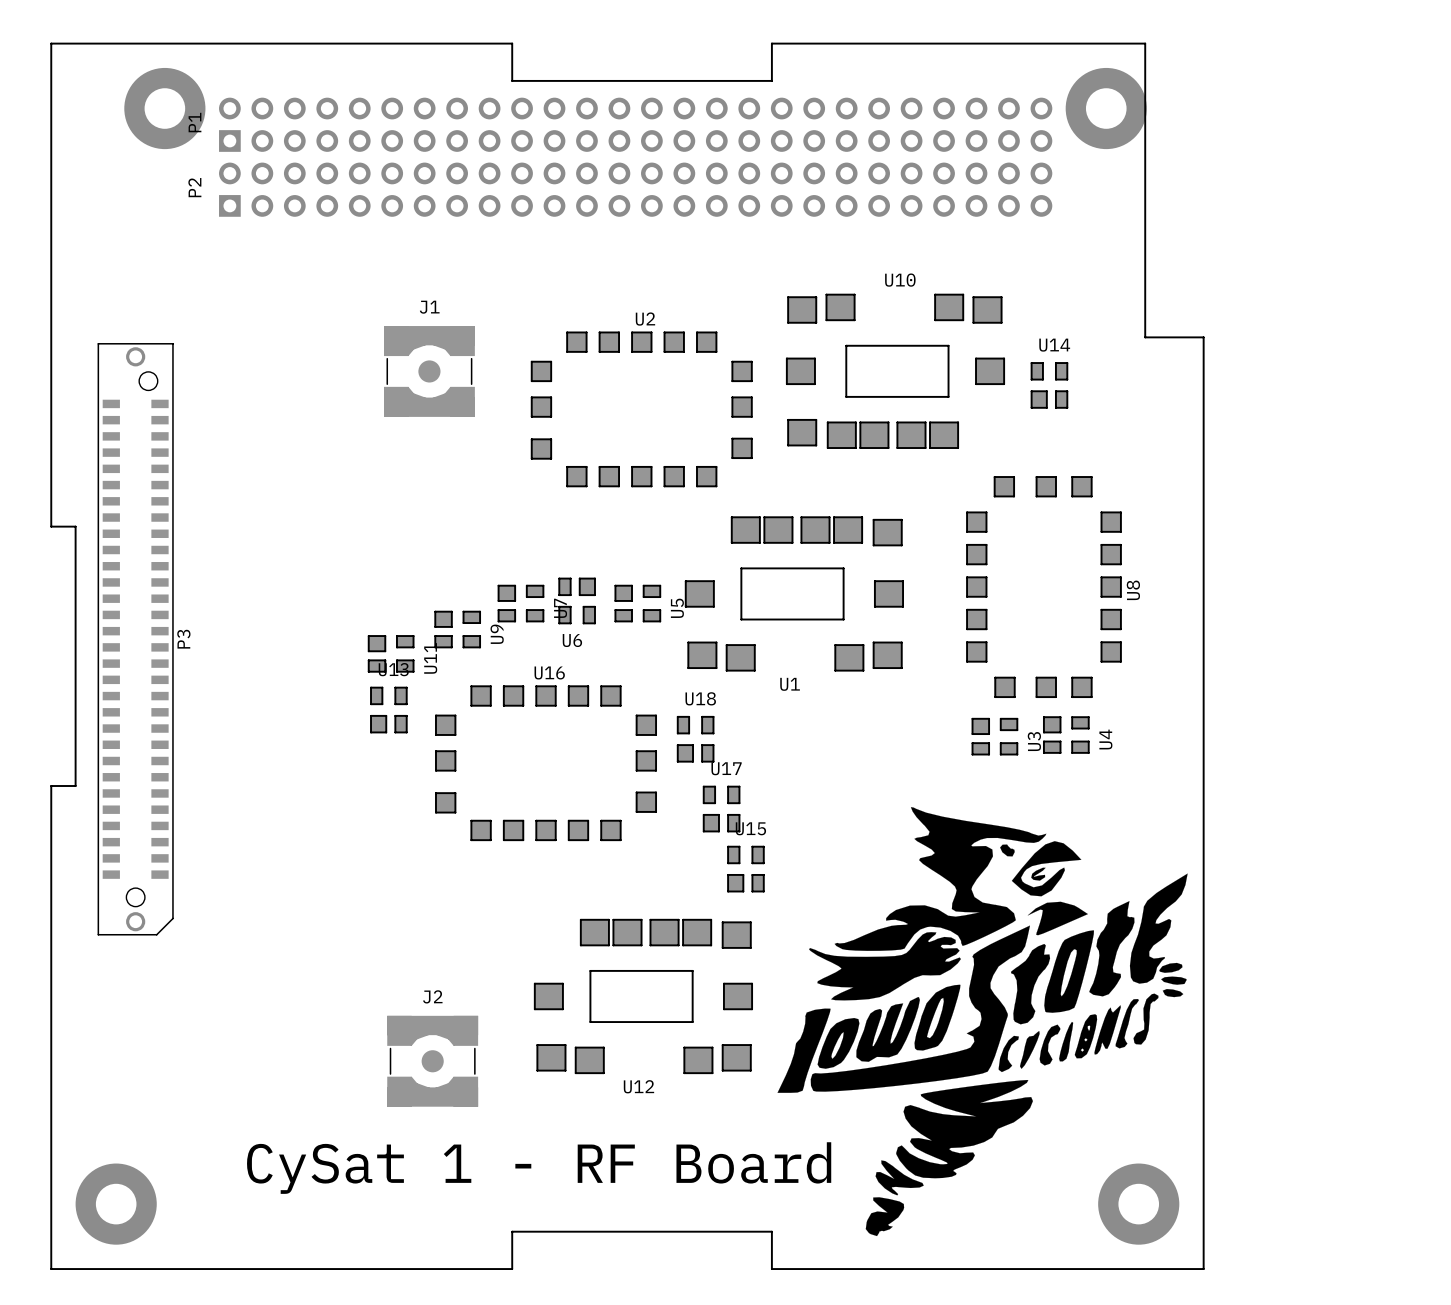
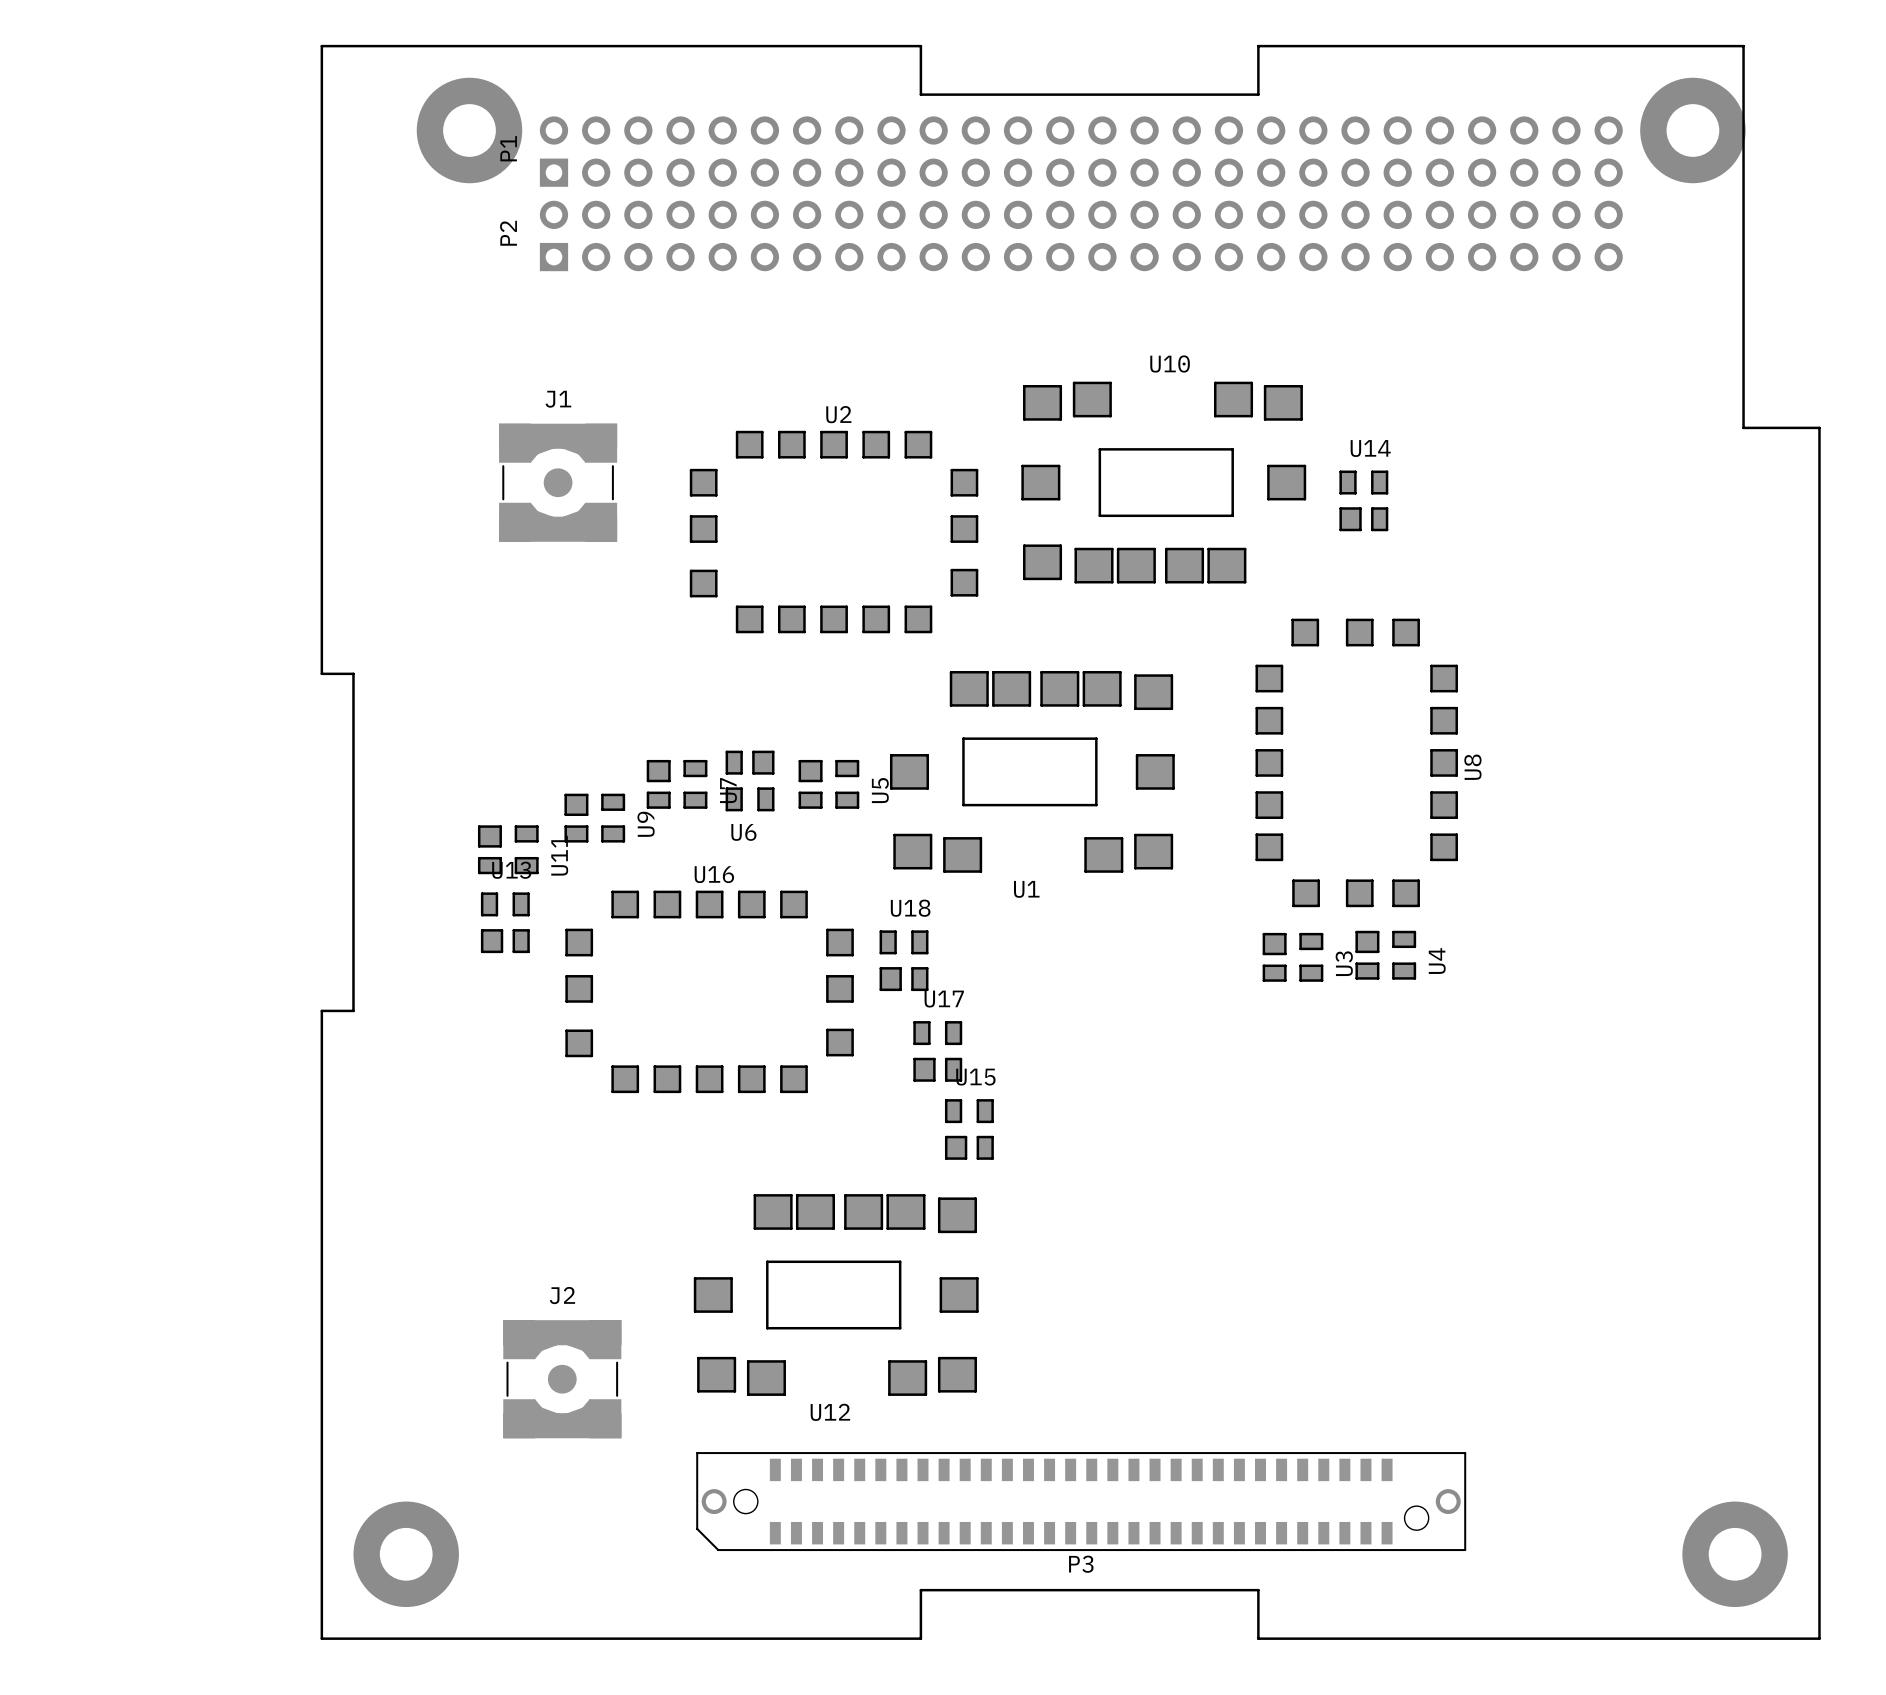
board edge: (51, 43) (51, 526) (75, 526) (75, 786) (51, 786) (51, 1269) (512, 1269) (512, 1231) (771, 1231) (771, 1269) (1203, 1269) (1203, 337) (1145, 337) (1145, 43) (771, 43) (771, 80) (512, 80) (512, 43) (51, 43) -> (321, 46) (321, 673) (353, 673) (353, 1010) (321, 1010) (321, 1638) (920, 1638) (920, 1590) (1258, 1590) (1258, 1638) (1819, 1638) (1819, 427) (1743, 427) (1743, 46) (1258, 46) (1258, 94) (920, 94) (920, 46) (321, 46)
part position: (164, 108) -> (469, 130)
part position: (1106, 108) -> (1692, 130)
P1 position: (635, 124) -> (1081, 151)
P2 position: (635, 189) -> (1081, 235)
P3 rotation: 0° (135, 639) -> 90° clockwise (1081, 1501)
P3 position: (135, 639) -> (1081, 1501)
drawing: [777, 807, 1188, 1237] -> none
text: CySat 1 - RF Board (539, 1168) -> none
part position: (116, 1204) -> (406, 1554)
part position: (1138, 1204) -> (1735, 1554)

